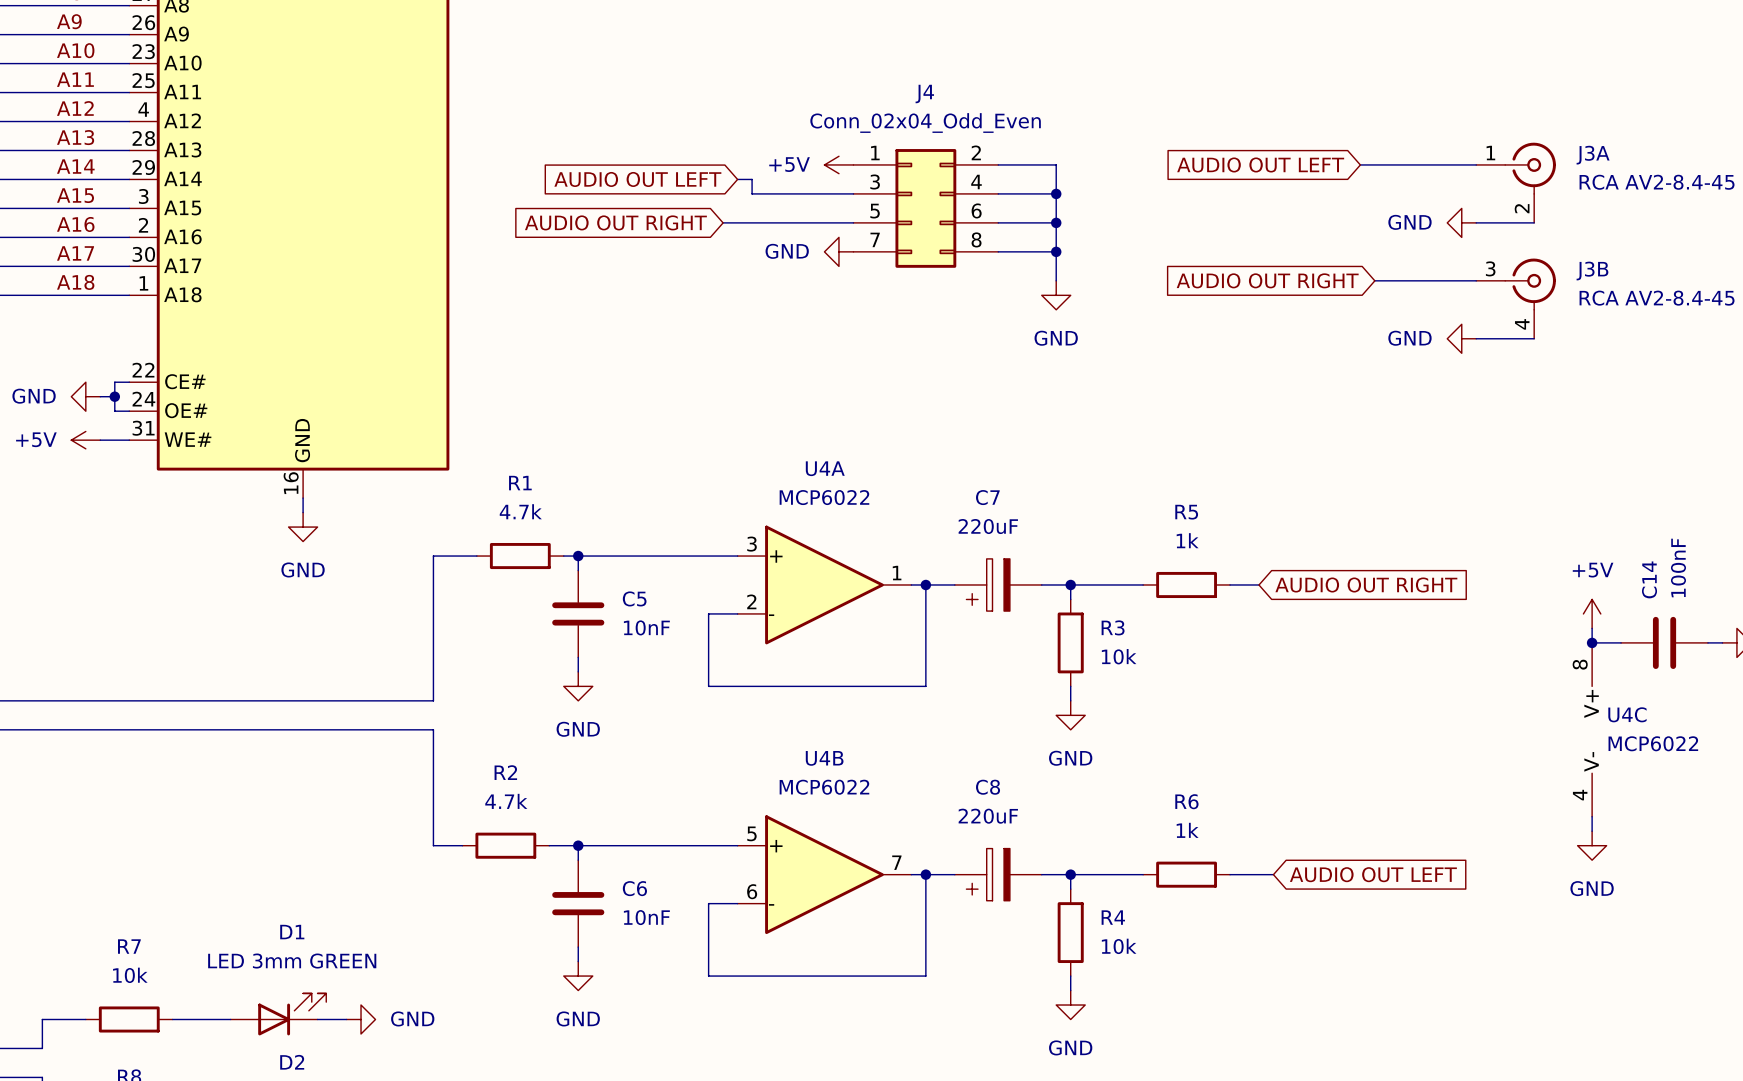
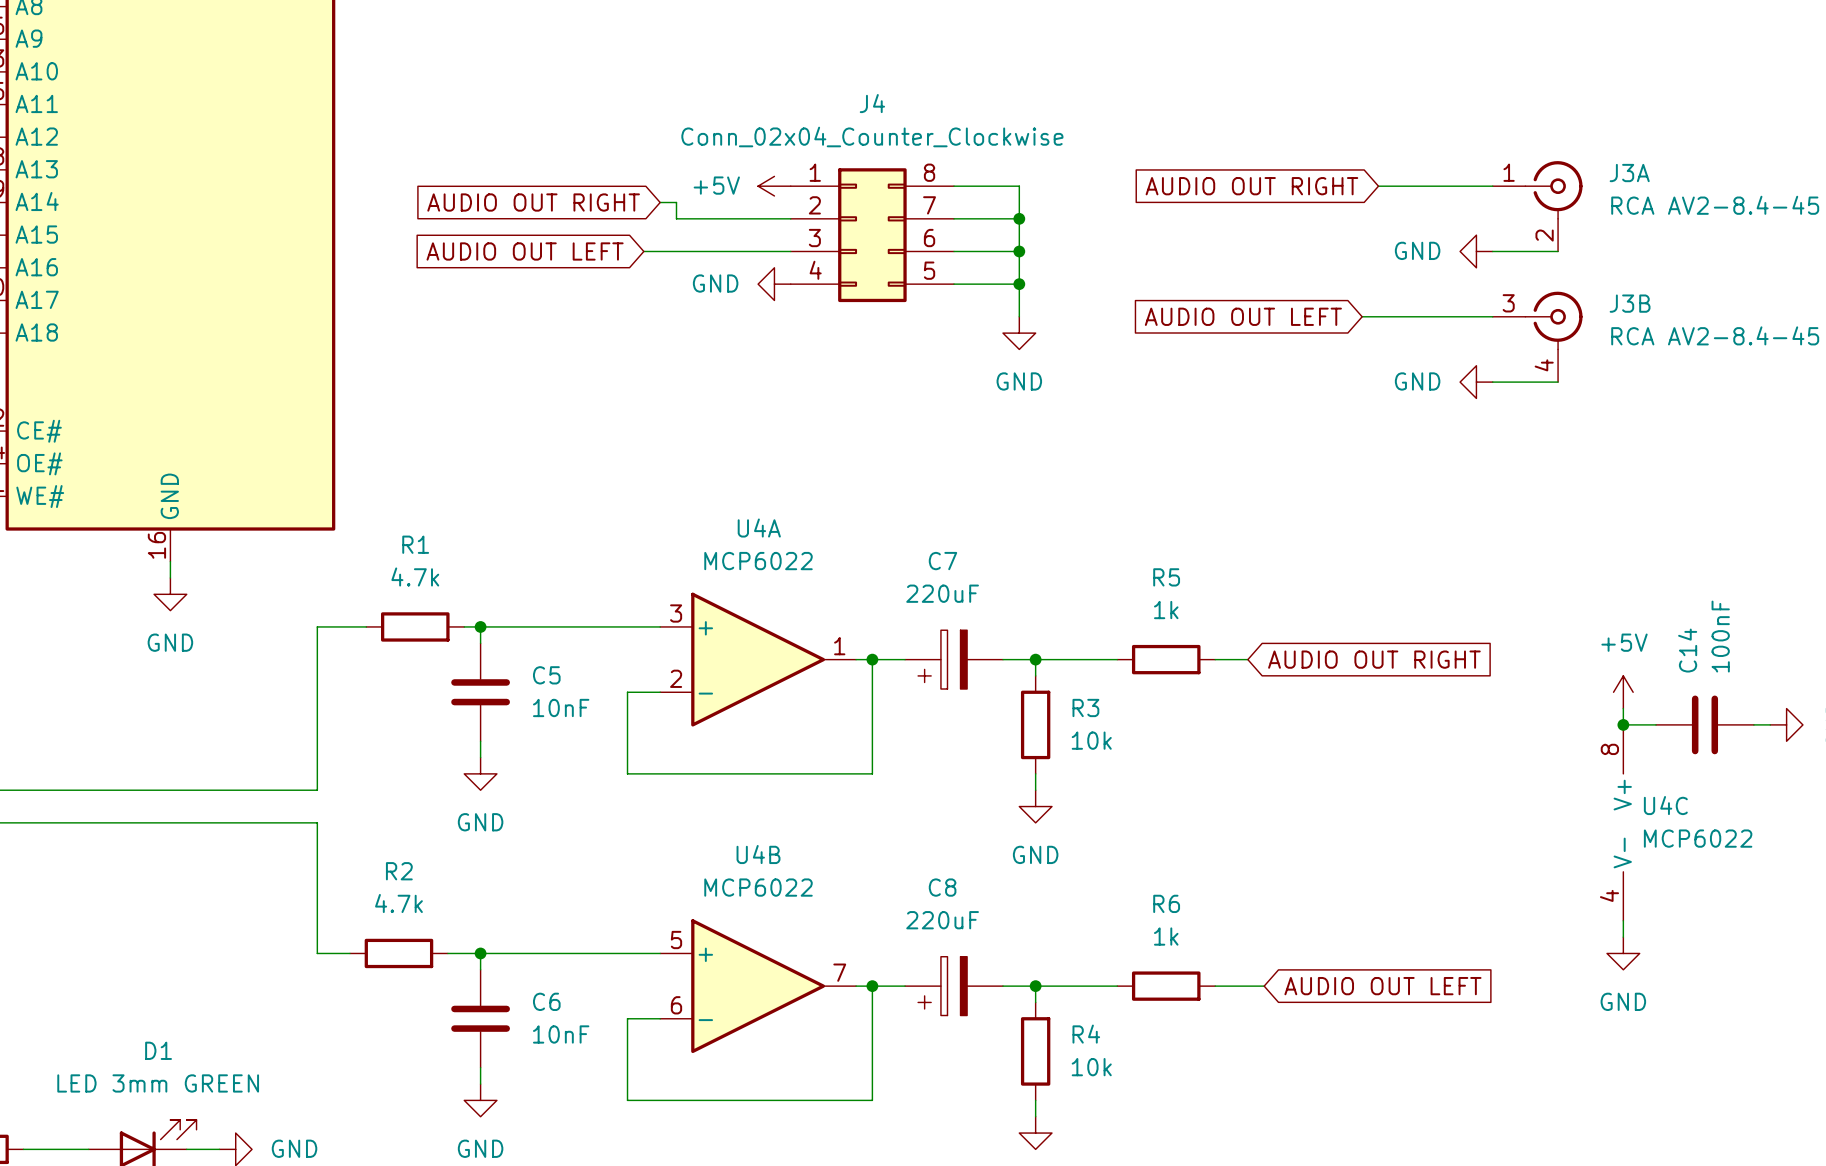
J4 value: Conn_02x04_Odd_Even (925, 123) -> Conn_02x04_Counter_Clockwise (872, 136)
J4 pin number: 2 (976, 152) -> 8 (929, 172)
global label position: AUDIO OUT LEFT (1260, 164) -> AUDIO OUT LEFT (1243, 316)
wire: (1360, 164) (1374, 164) -> (1362, 316) (1378, 316)
global label: AUDIO OUT LEFT (637, 179) -> AUDIO OUT RIGHT (533, 202)
J4 pin number: 4 (976, 181) -> 7 (929, 205)
J4 pin number: 3 (875, 182) -> 2 (814, 205)
J4 pin number: 5 (875, 211) -> 3 (814, 238)
global label: AUDIO OUT RIGHT (615, 222) -> AUDIO OUT LEFT (525, 251)
J4 pin number: 7 (875, 239) -> 4 (815, 270)
J4 pin number: 8 (976, 239) -> 5 (929, 270)
global label position: AUDIO OUT RIGHT (1267, 280) -> AUDIO OUT RIGHT (1251, 186)

